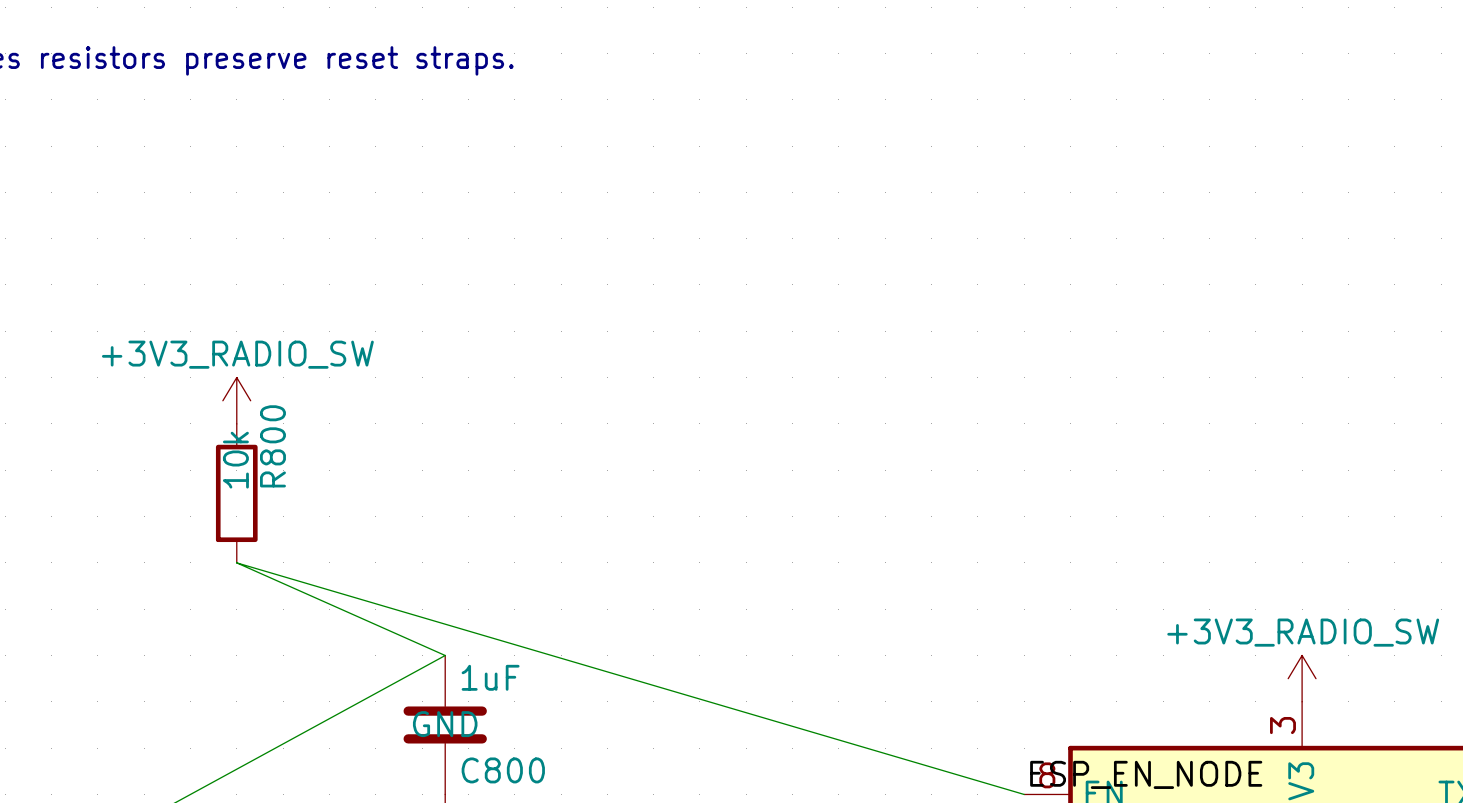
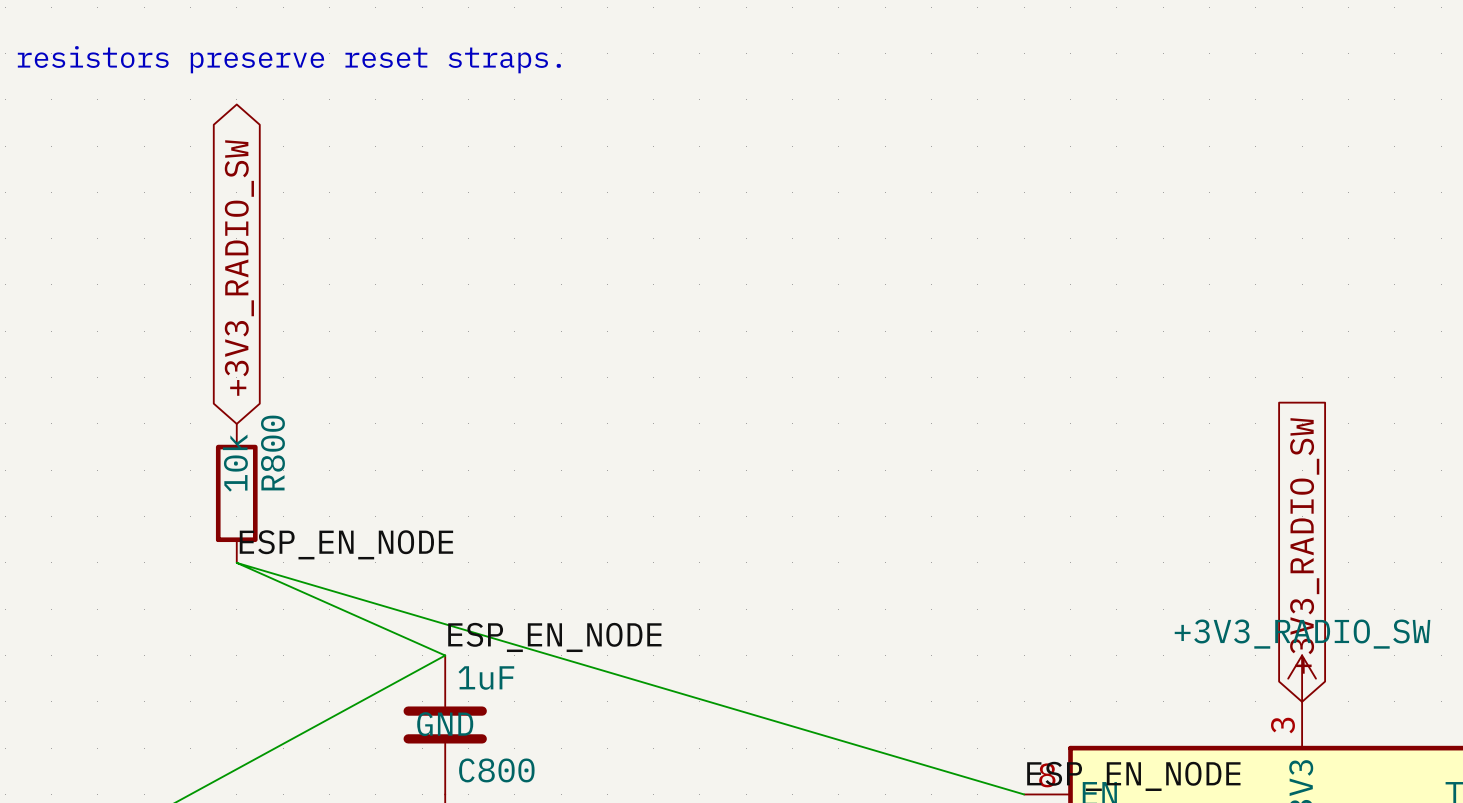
global label: none -> +3V3_RADIO_SW (239, 268)
power symbol: +3V3_RADIO_SW (236, 400) -> none
global label: none -> +3V3_RADIO_SW (1304, 545)
label: none -> ESP_EN_NODE (346, 544)
label: none -> ESP_EN_NODE (554, 637)

